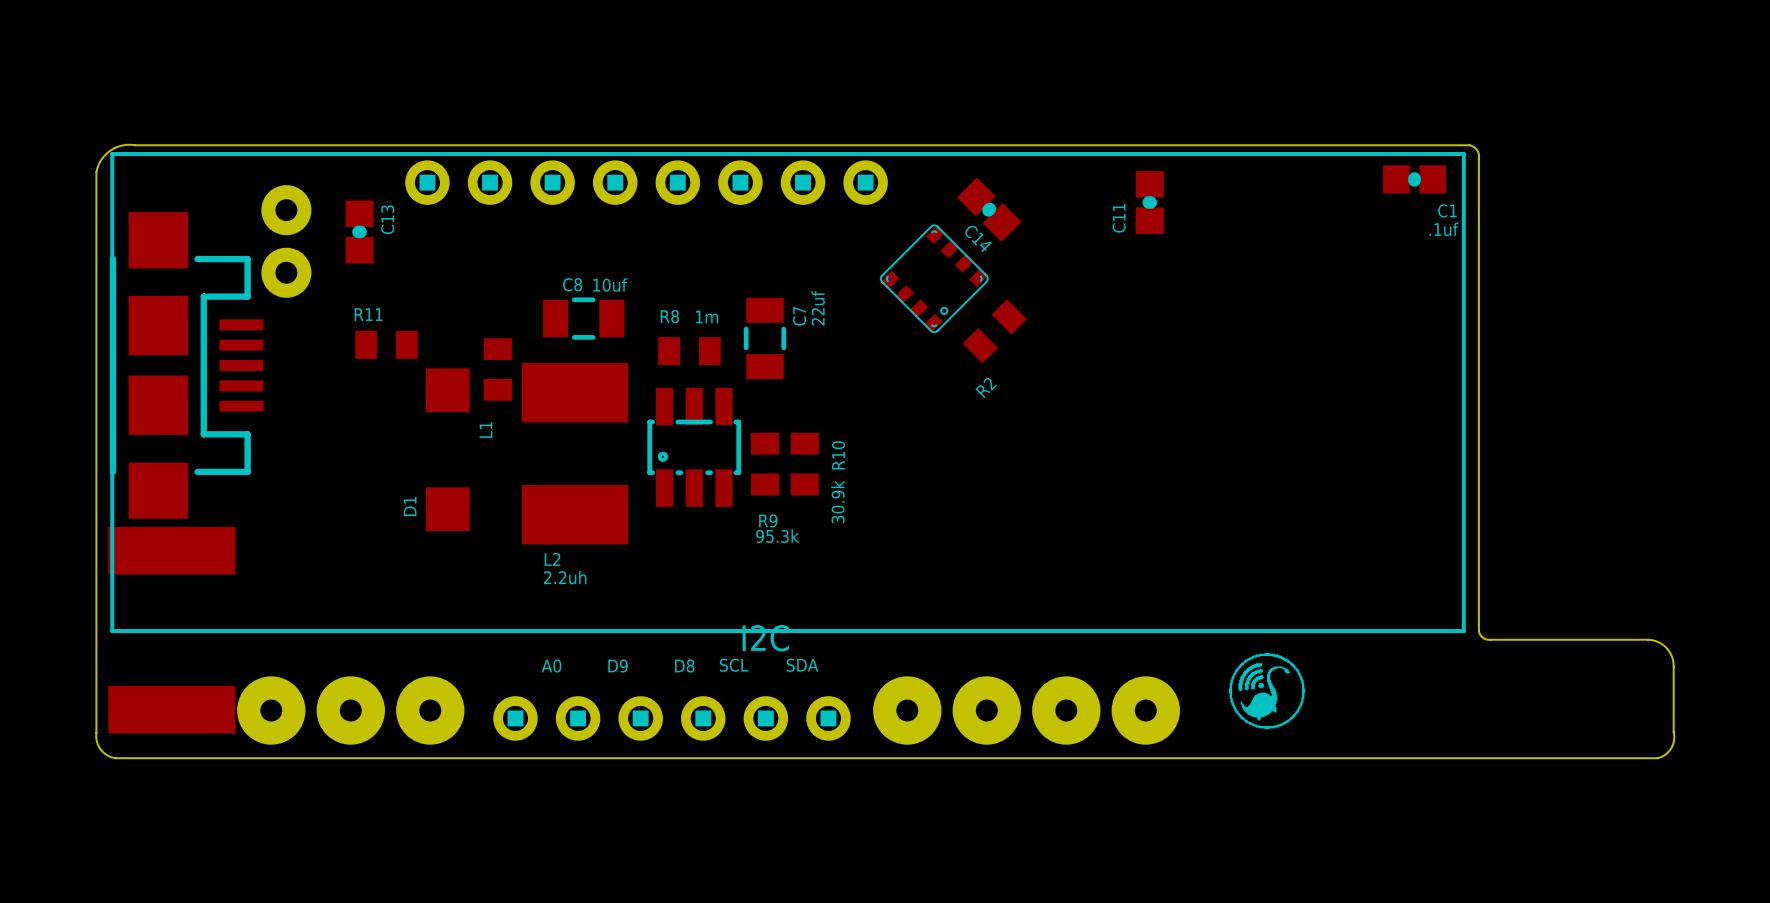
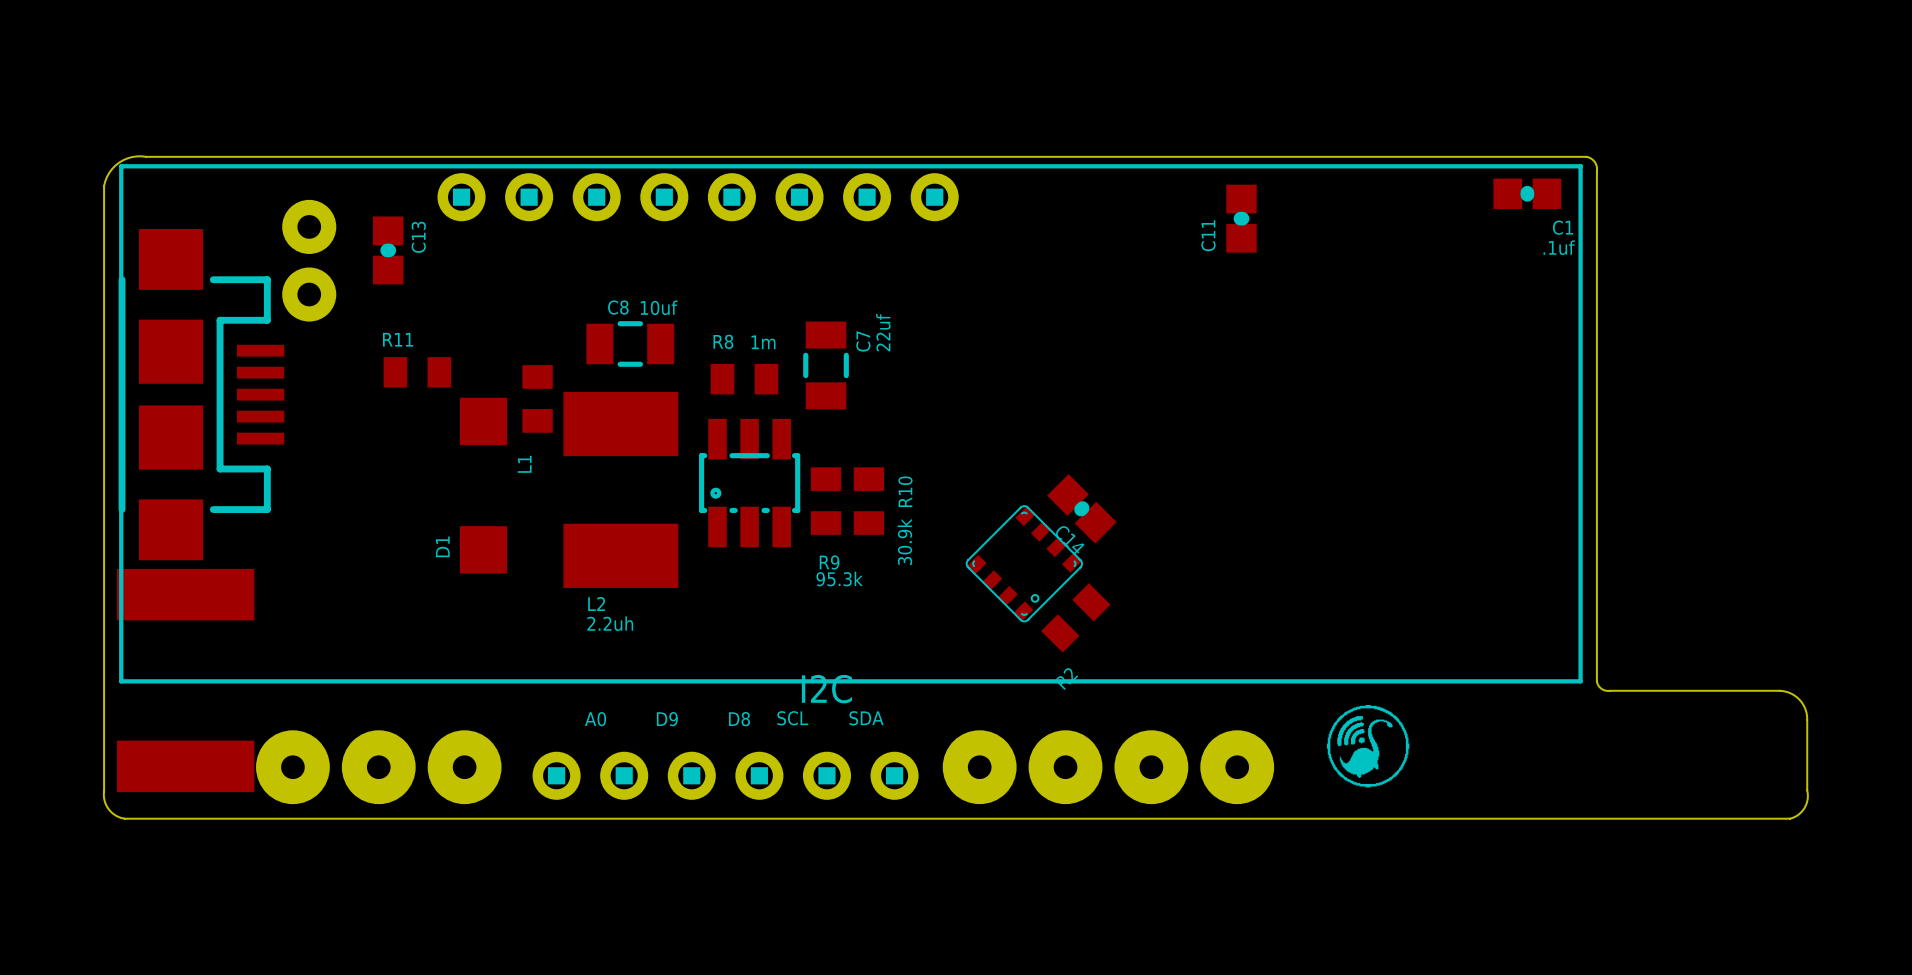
C14 position: (989, 209) -> (1081, 508)
part position: (934, 278) -> (1024, 563)
R2 position: (994, 331) -> (1075, 617)

